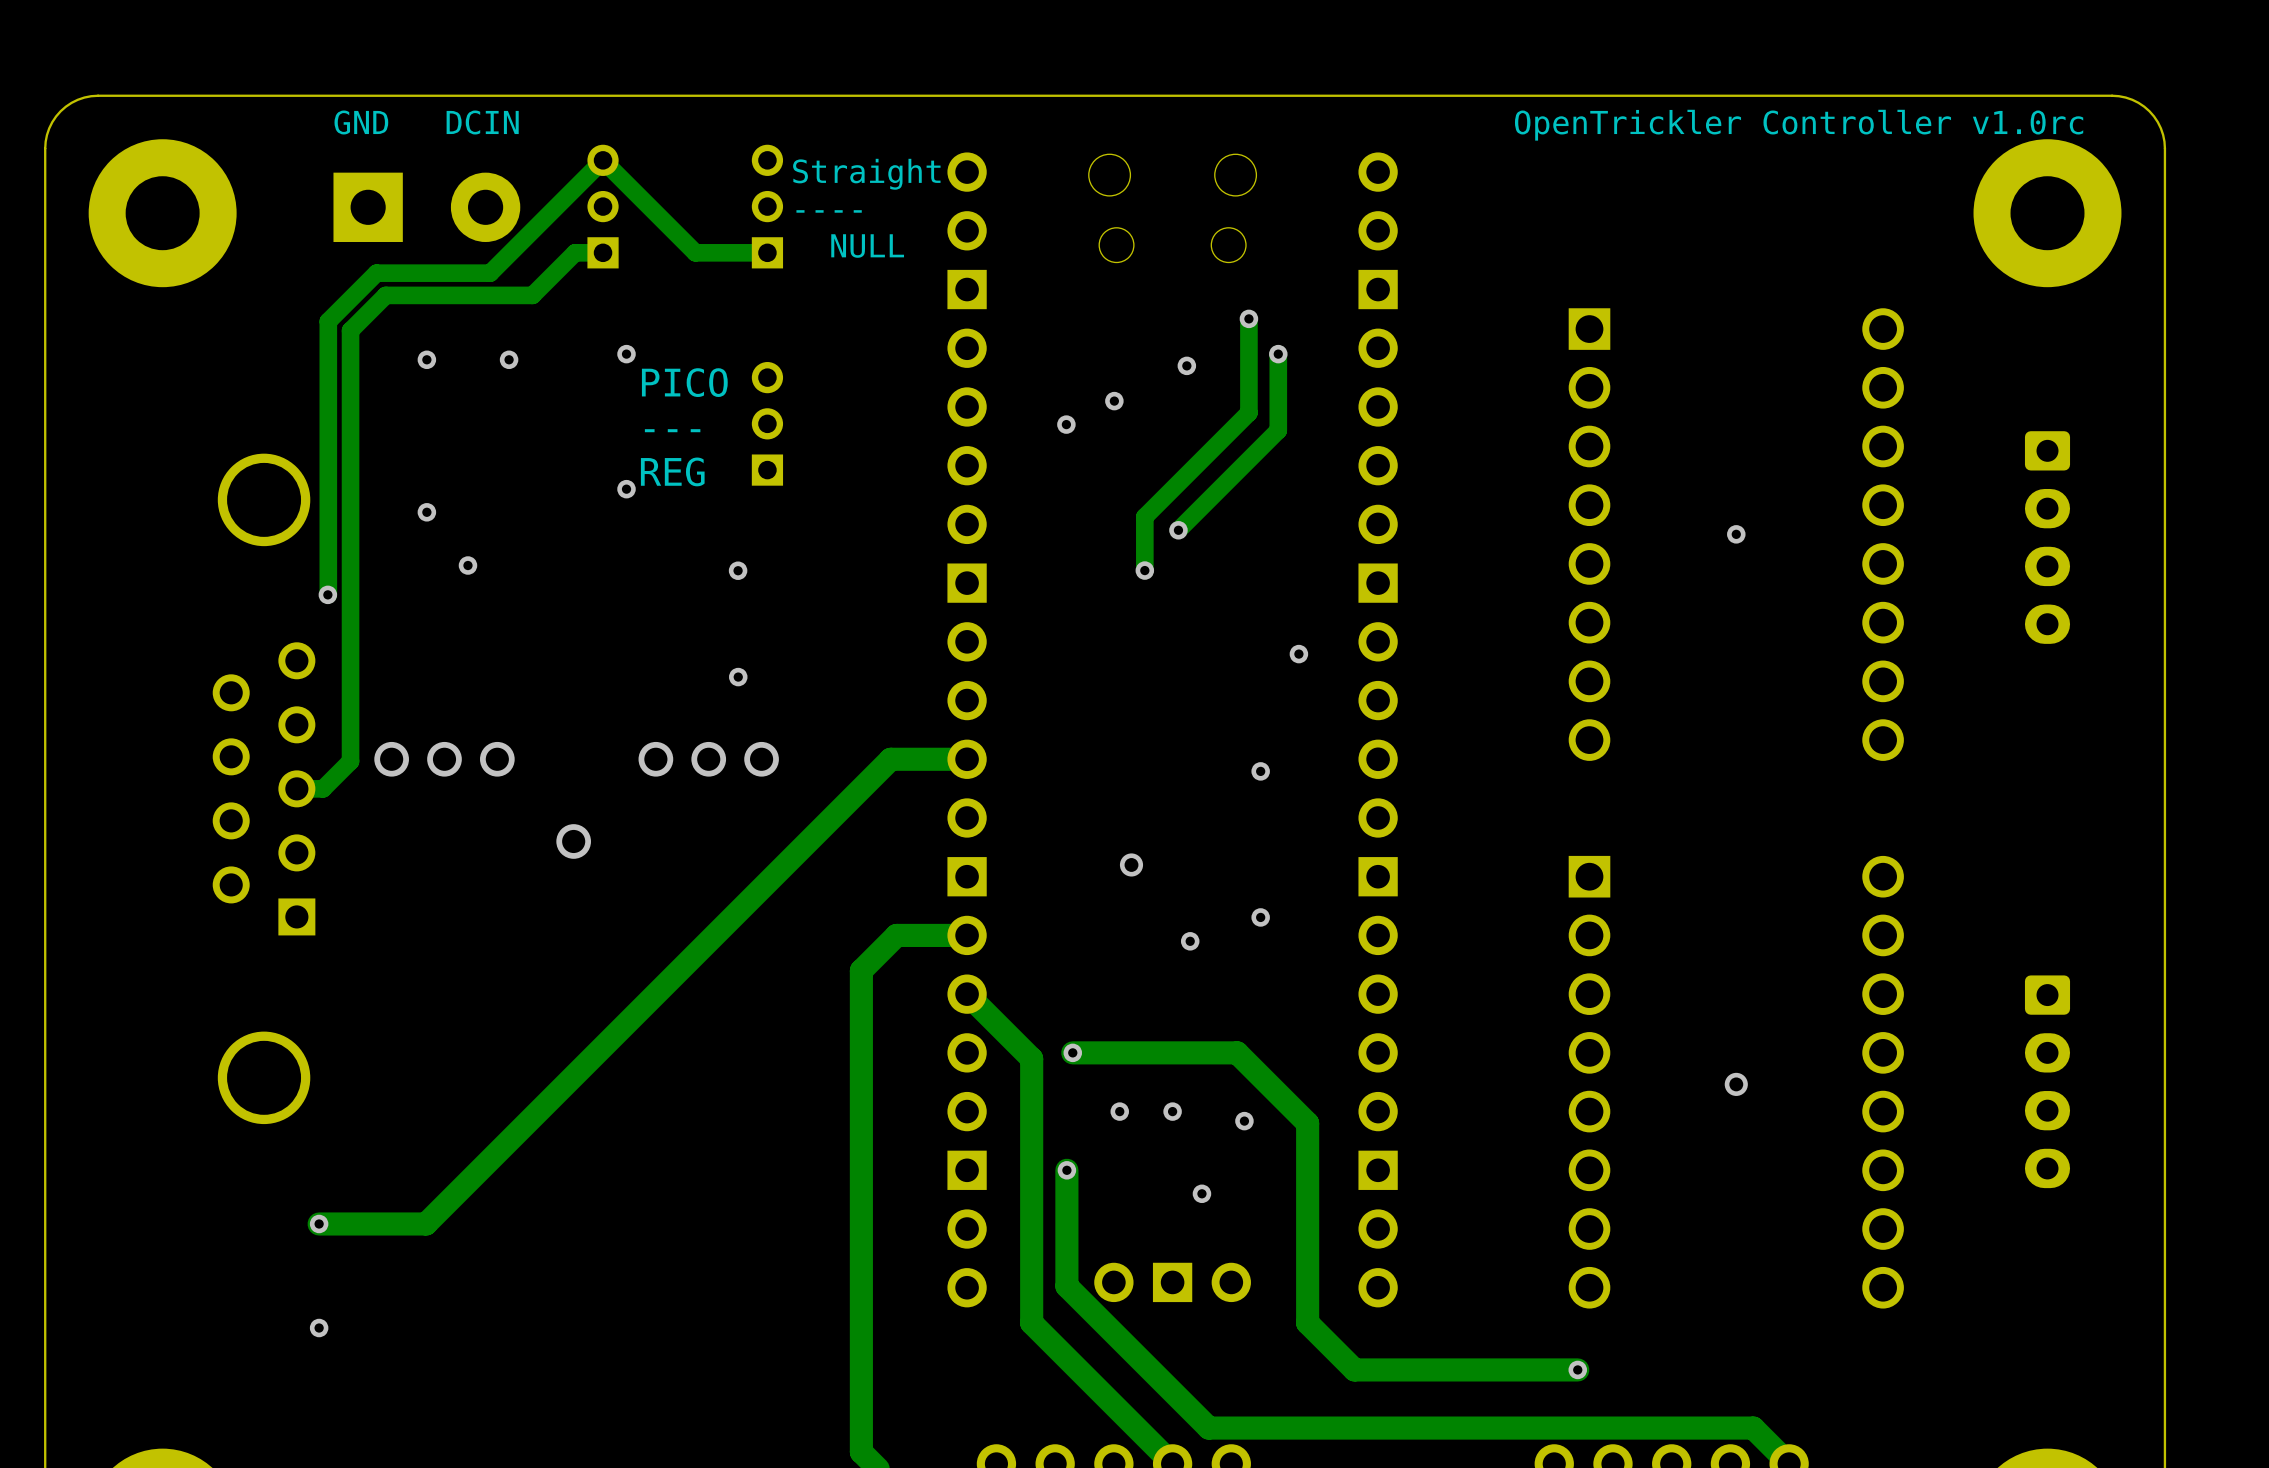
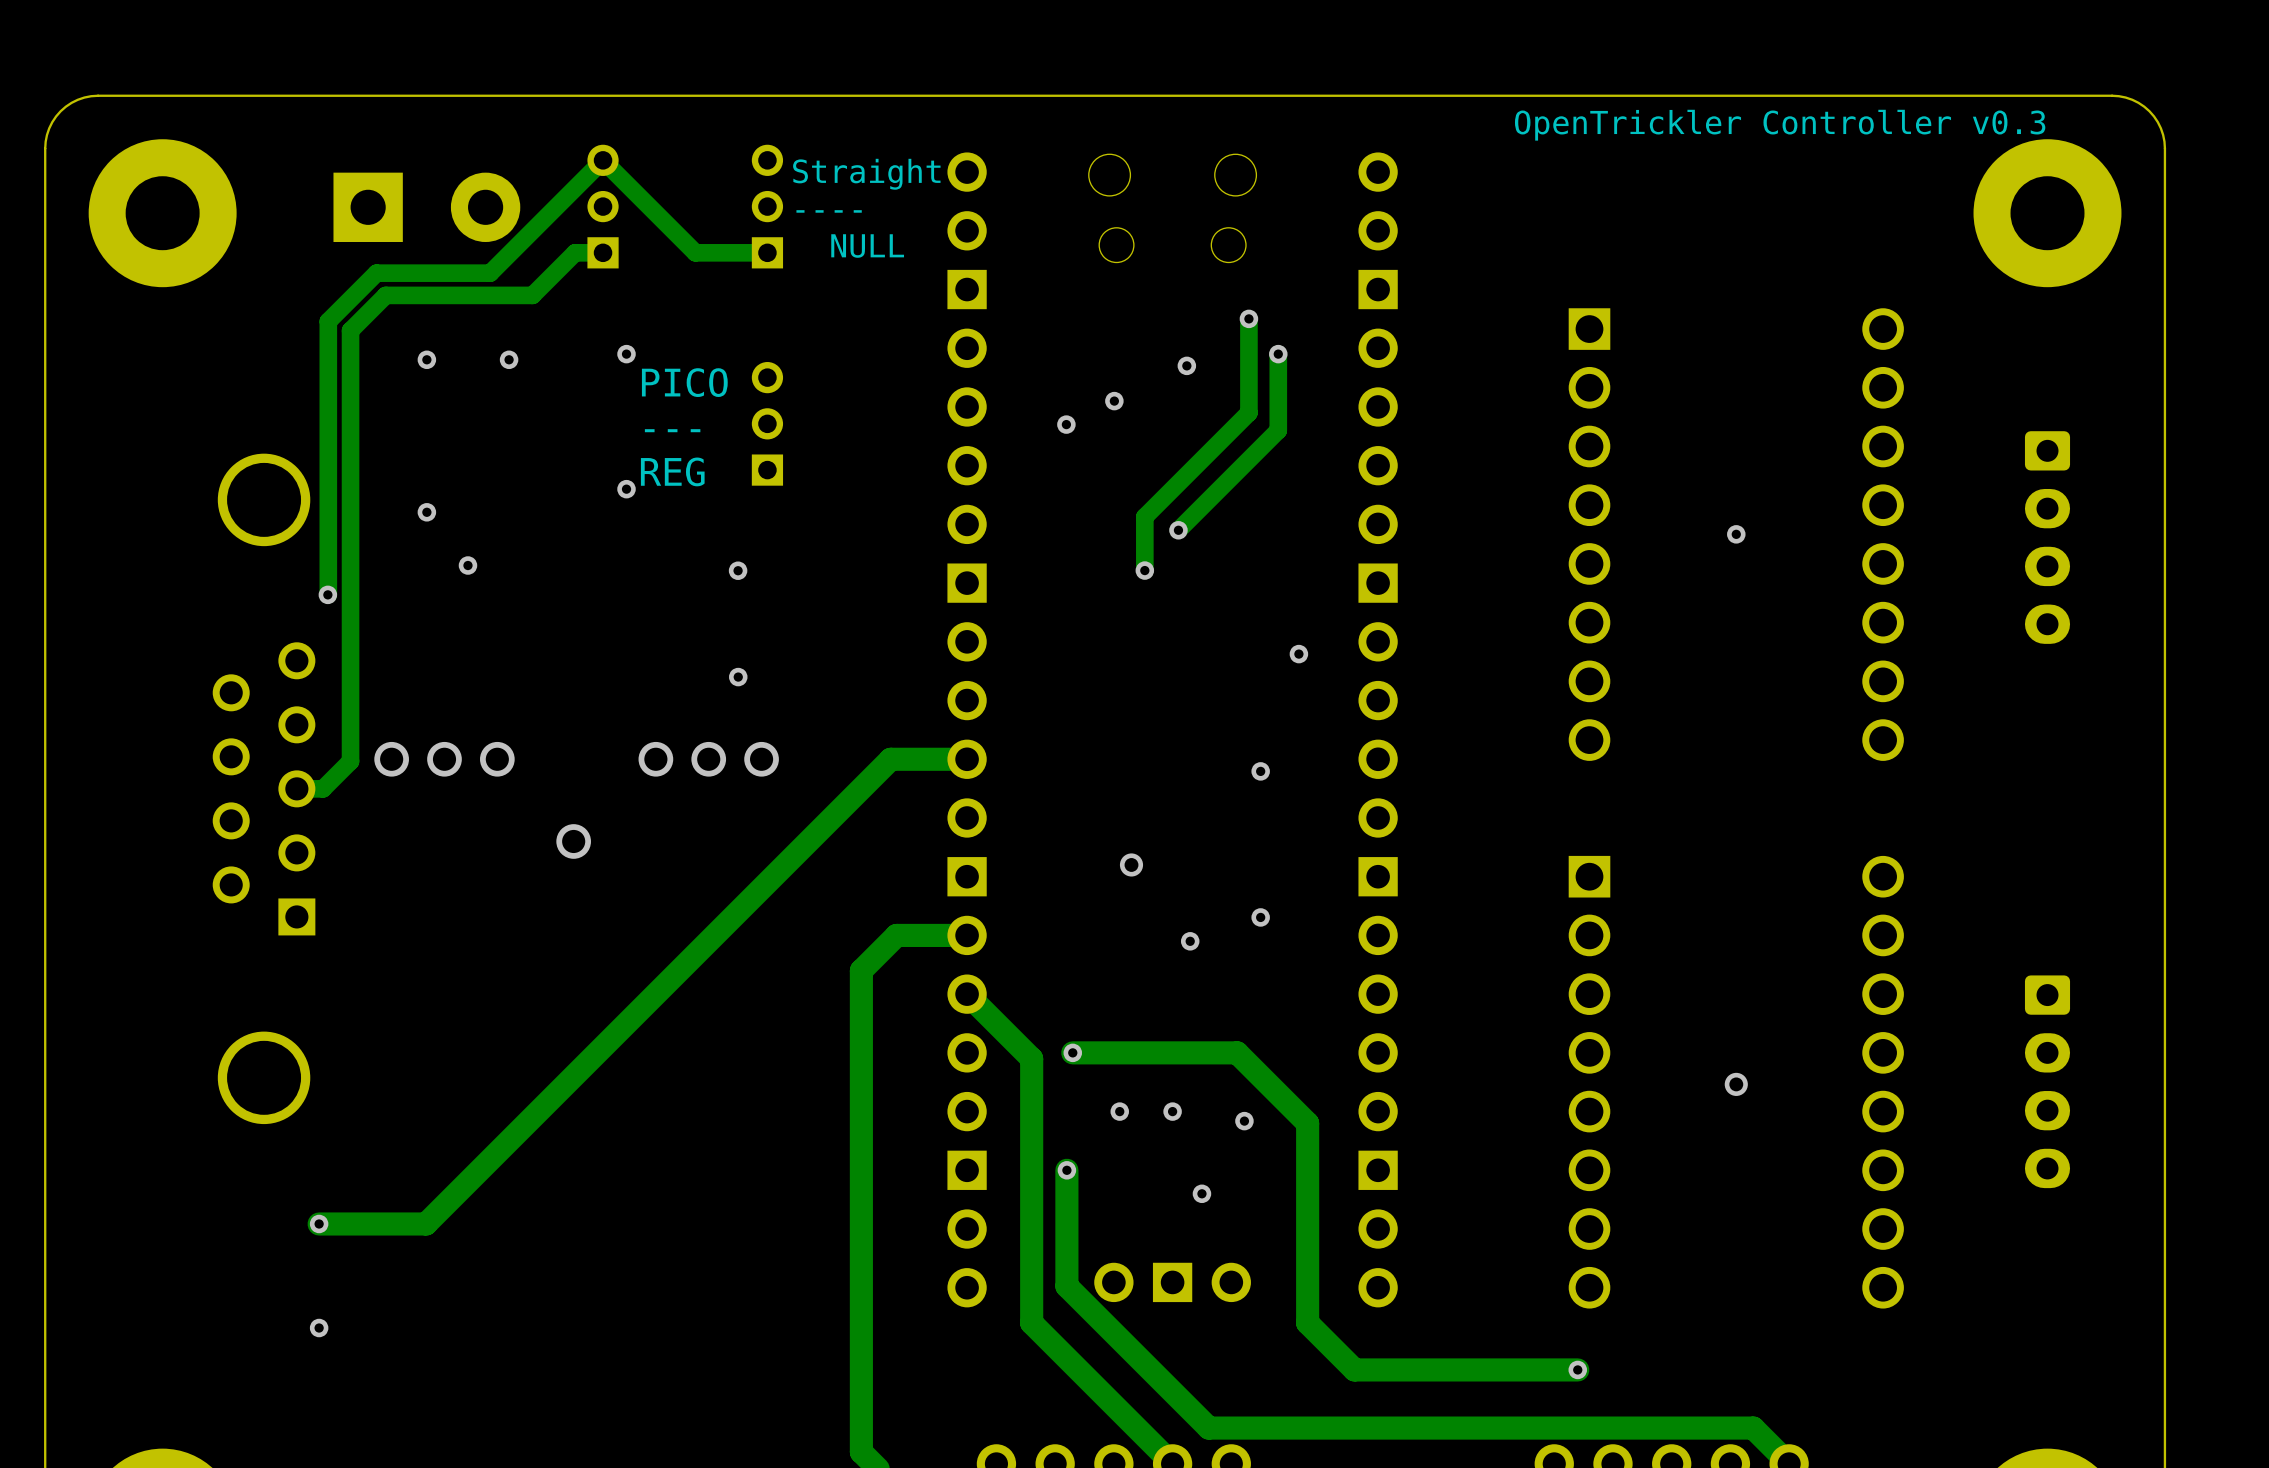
text: GND (361, 122) -> none
text: DCIN (482, 122) -> none
text: OpenTrickler Controller v1.0rc (1799, 125) -> OpenTrickler Controller v0.3 (1780, 125)

